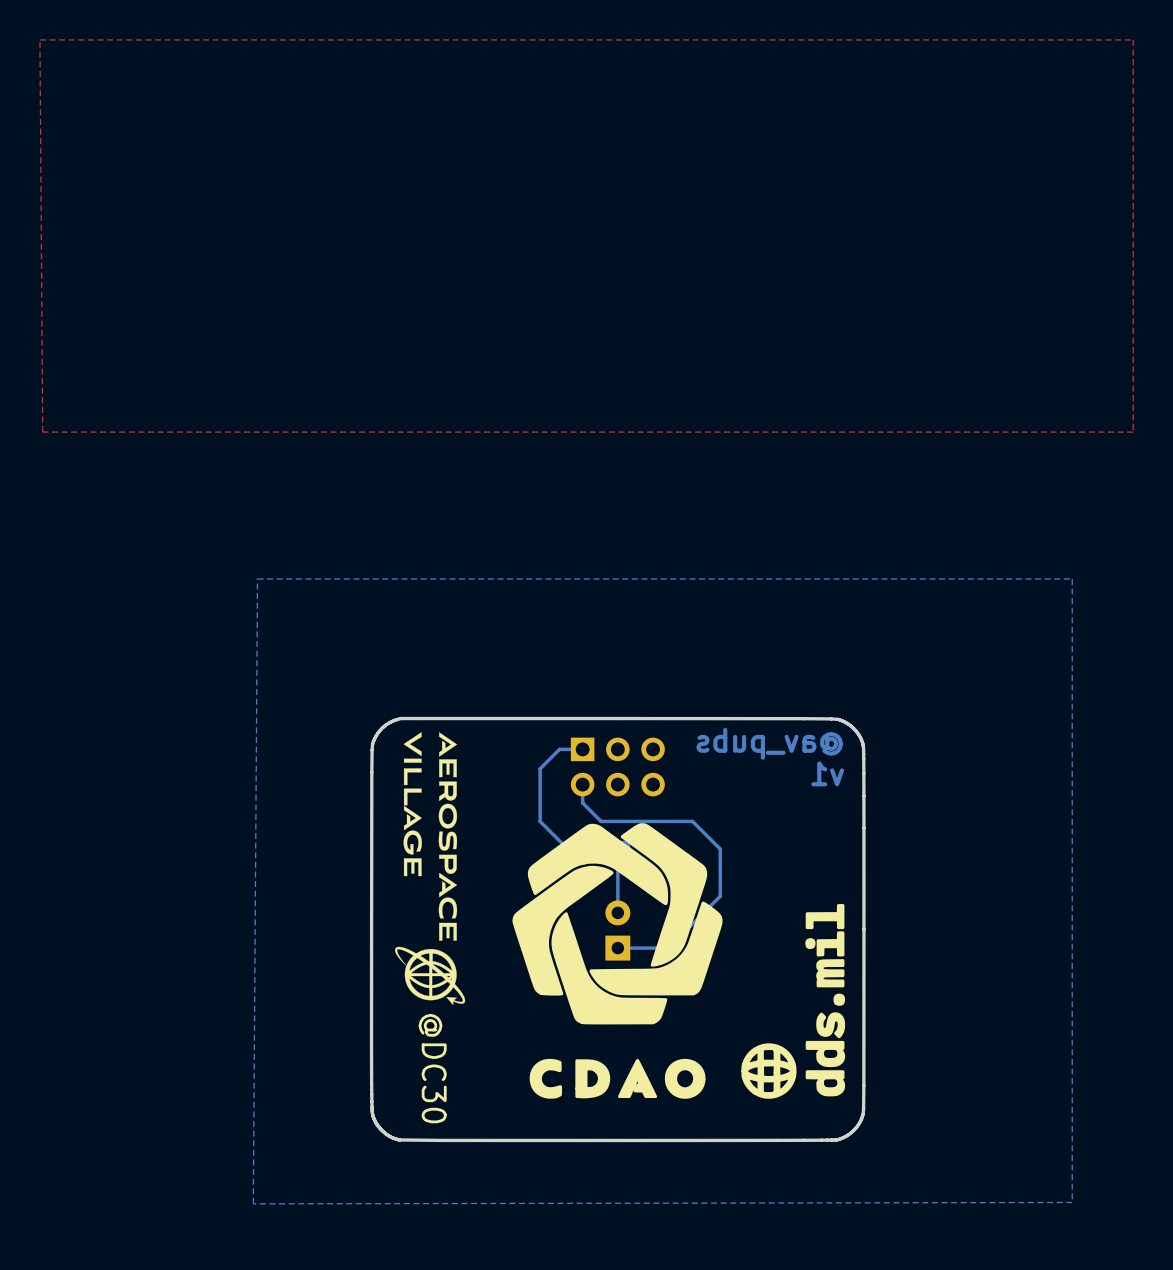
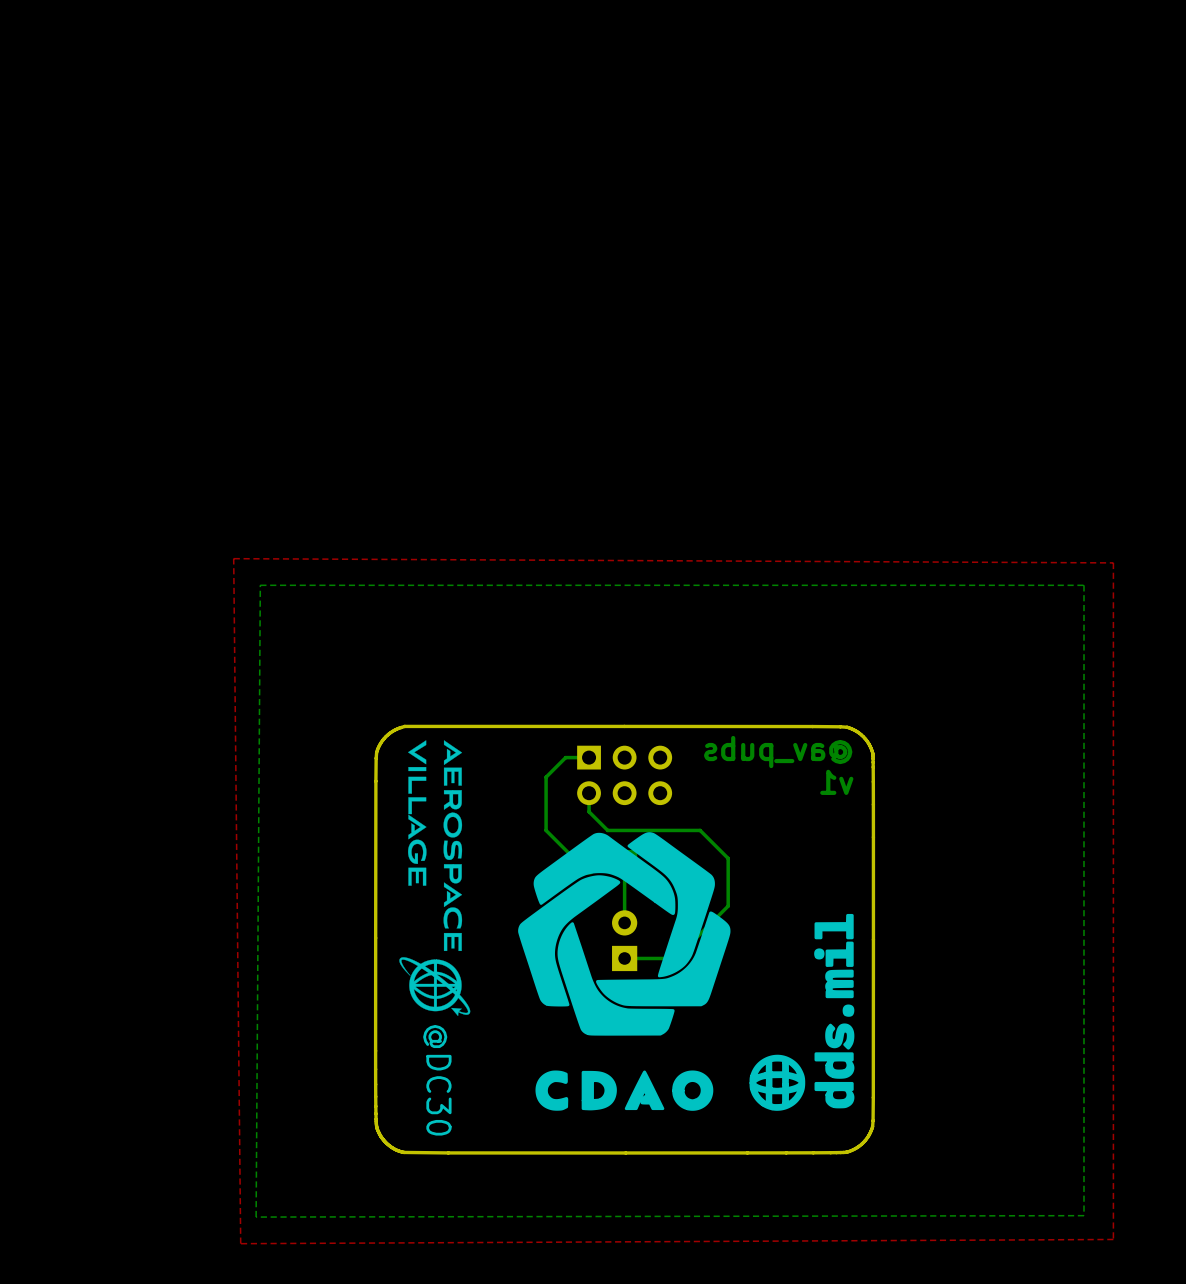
top zone outline: (39, 39) (42, 432) (1133, 432) (1133, 39) (39, 39) -> none
top zone outline: none -> (233, 558) (240, 1243) (1113, 1239) (1113, 562) (233, 558)

